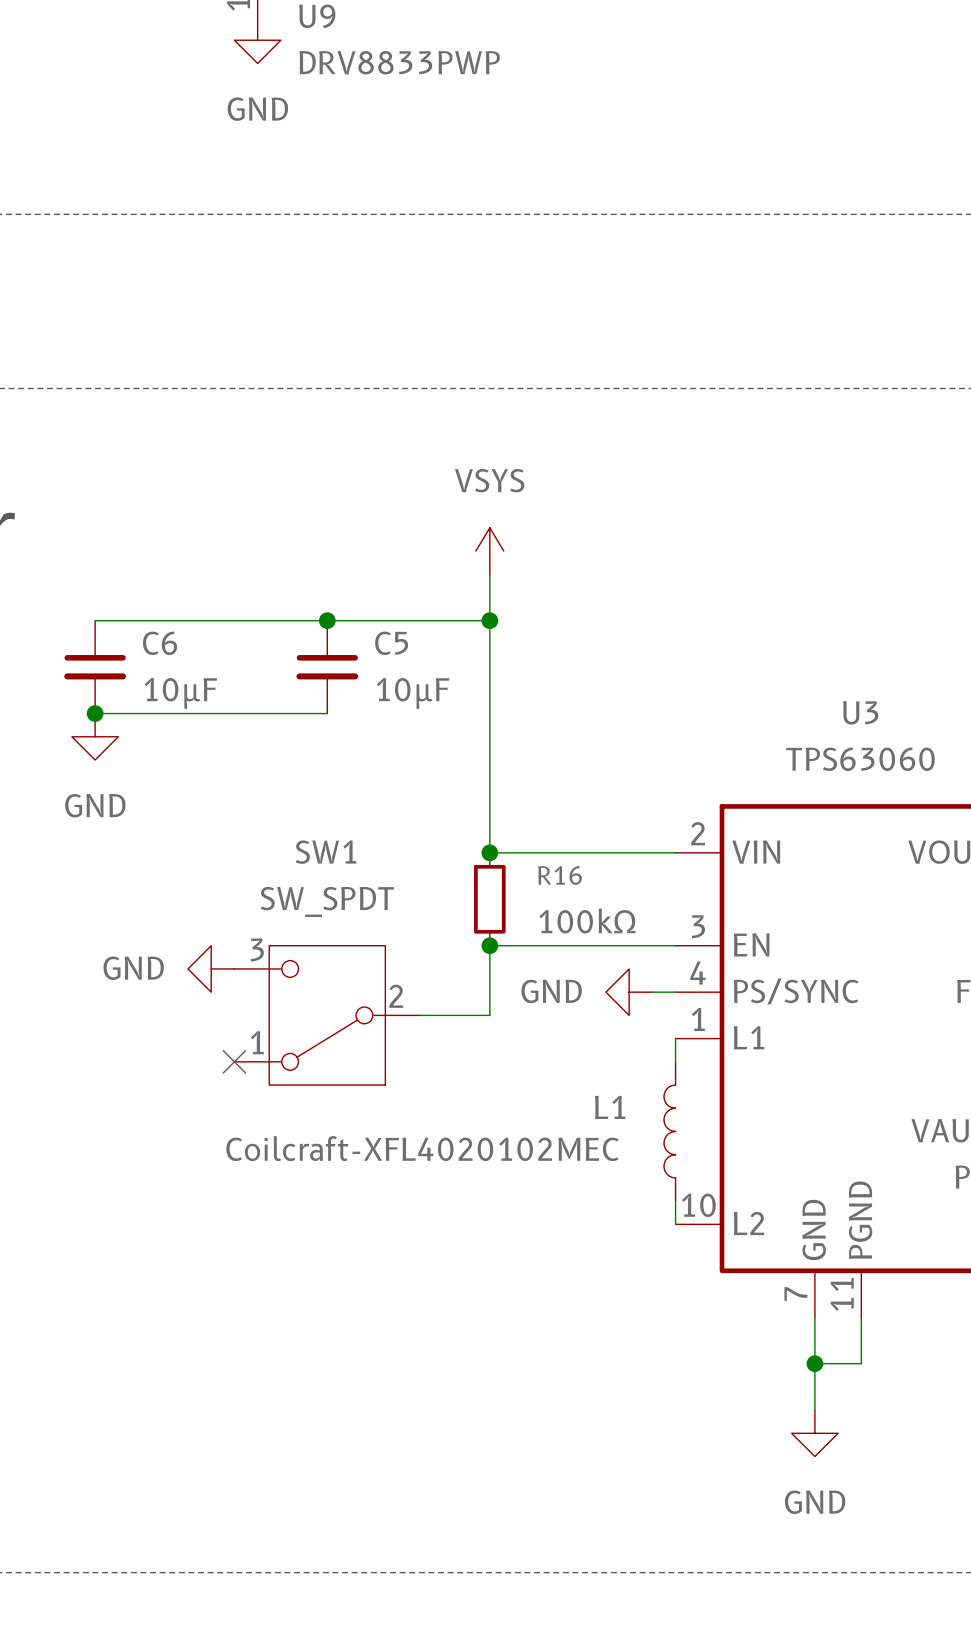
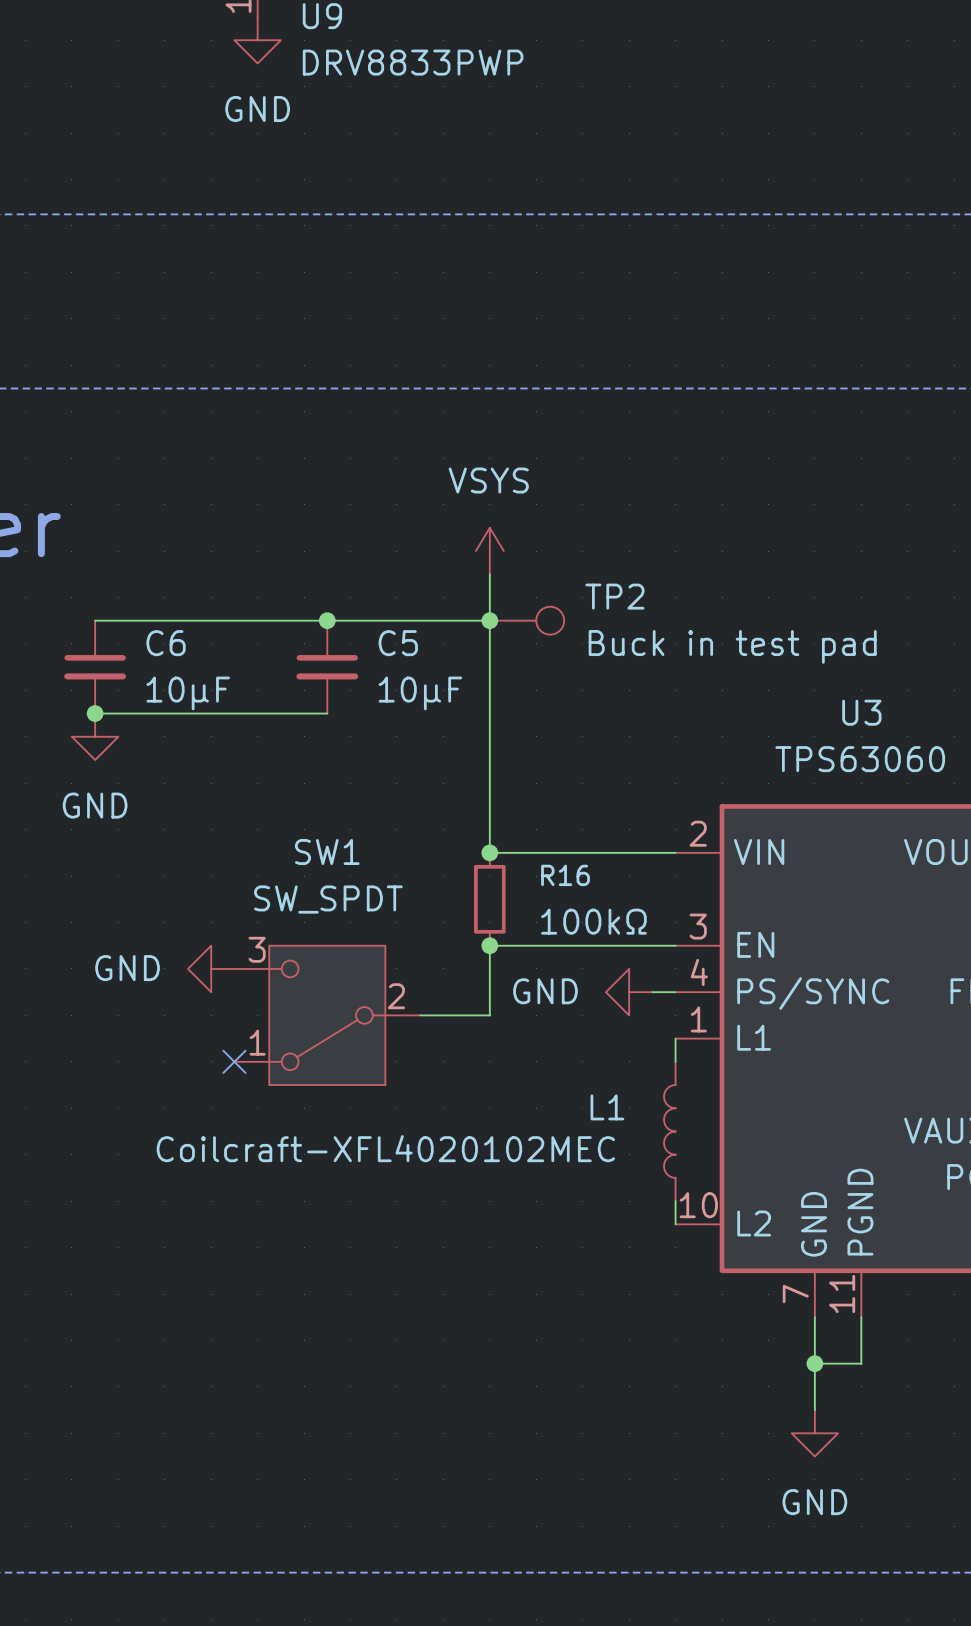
TP2: none -> Buck in test pad (526, 620)

